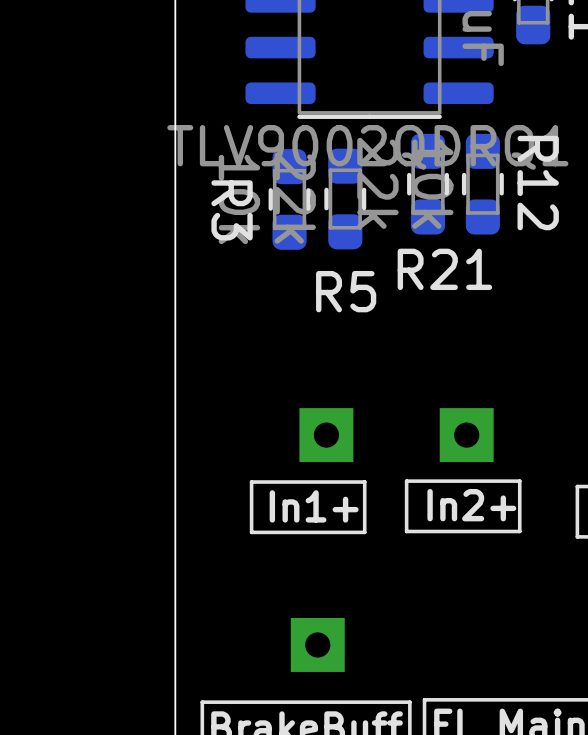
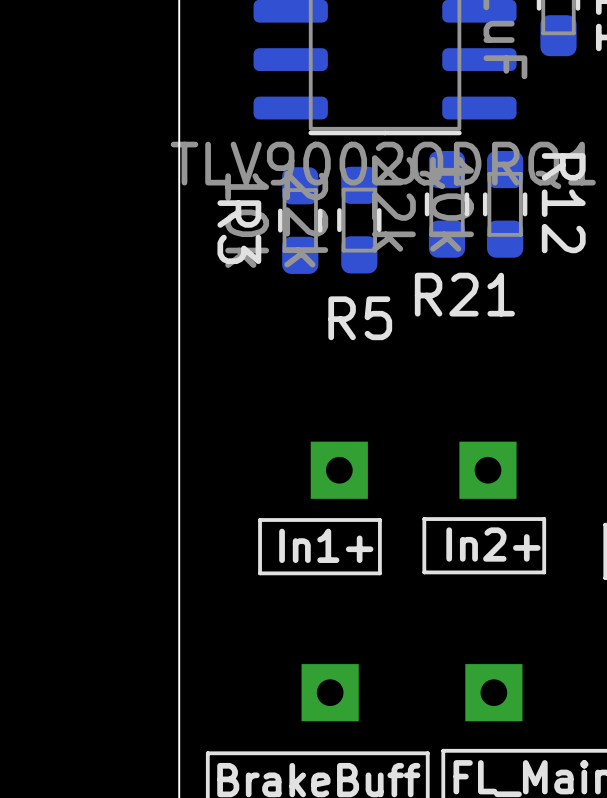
part: none -> (493, 692)

